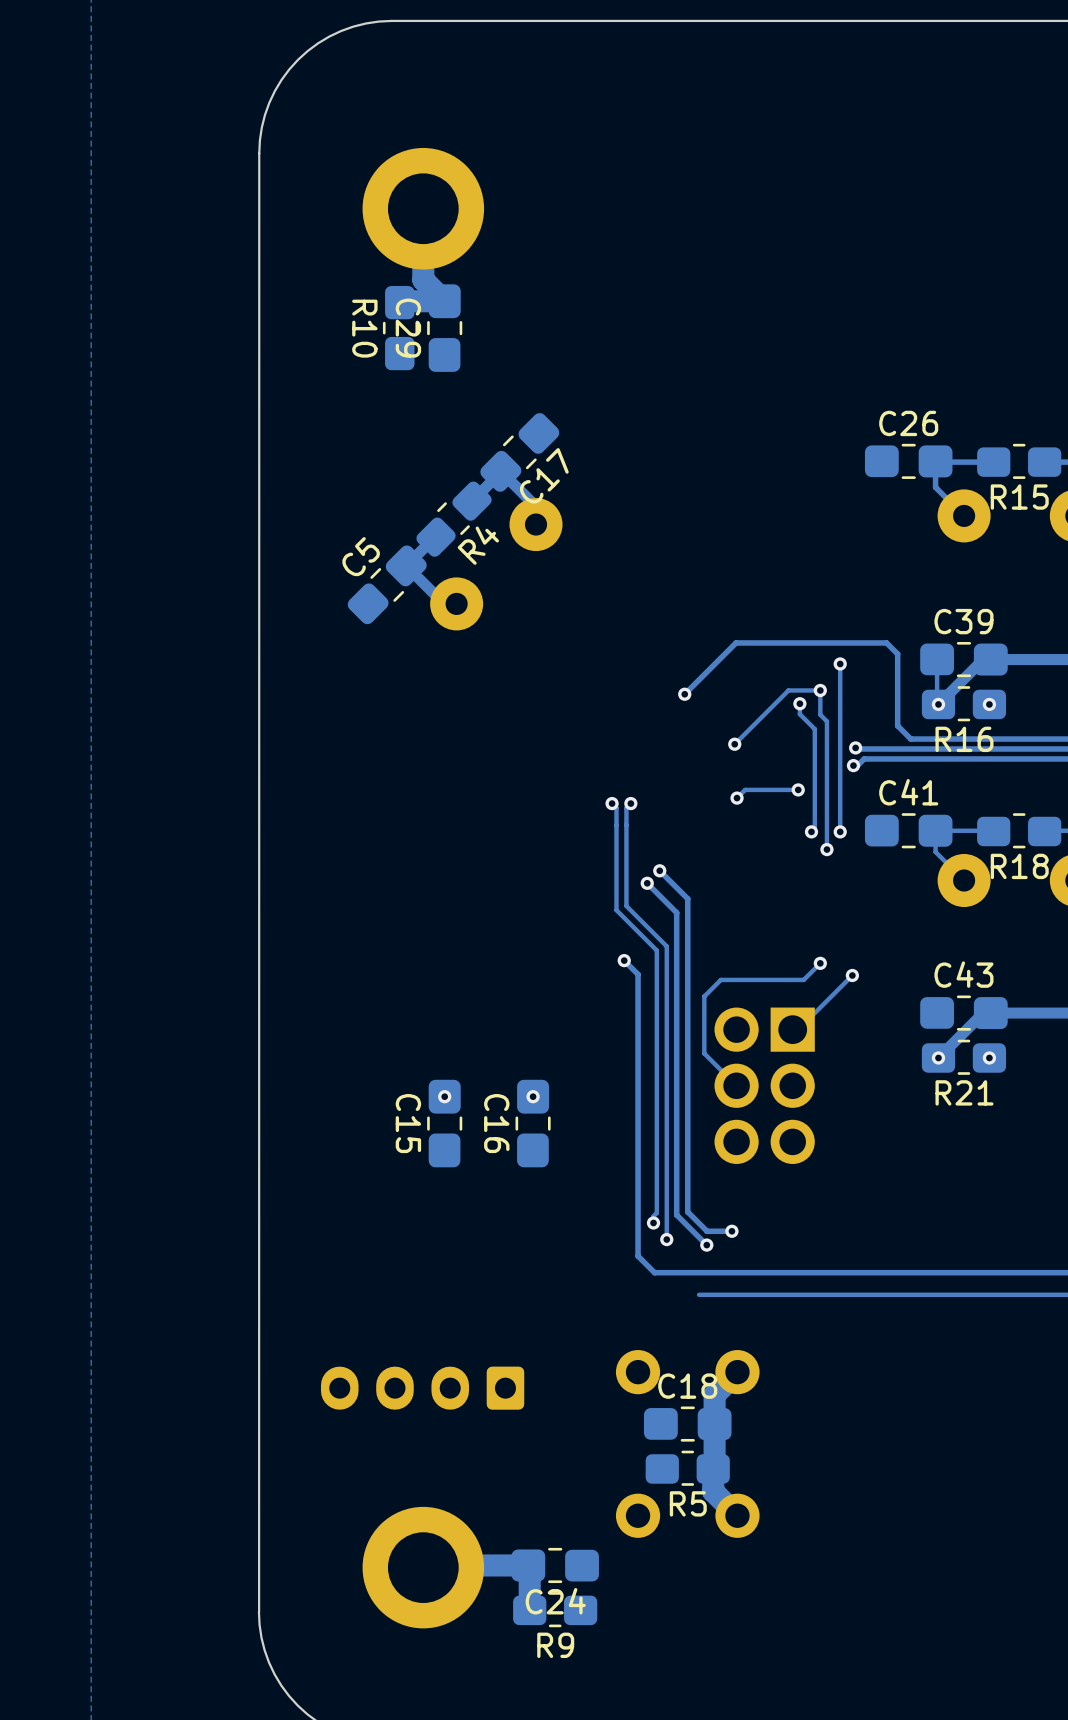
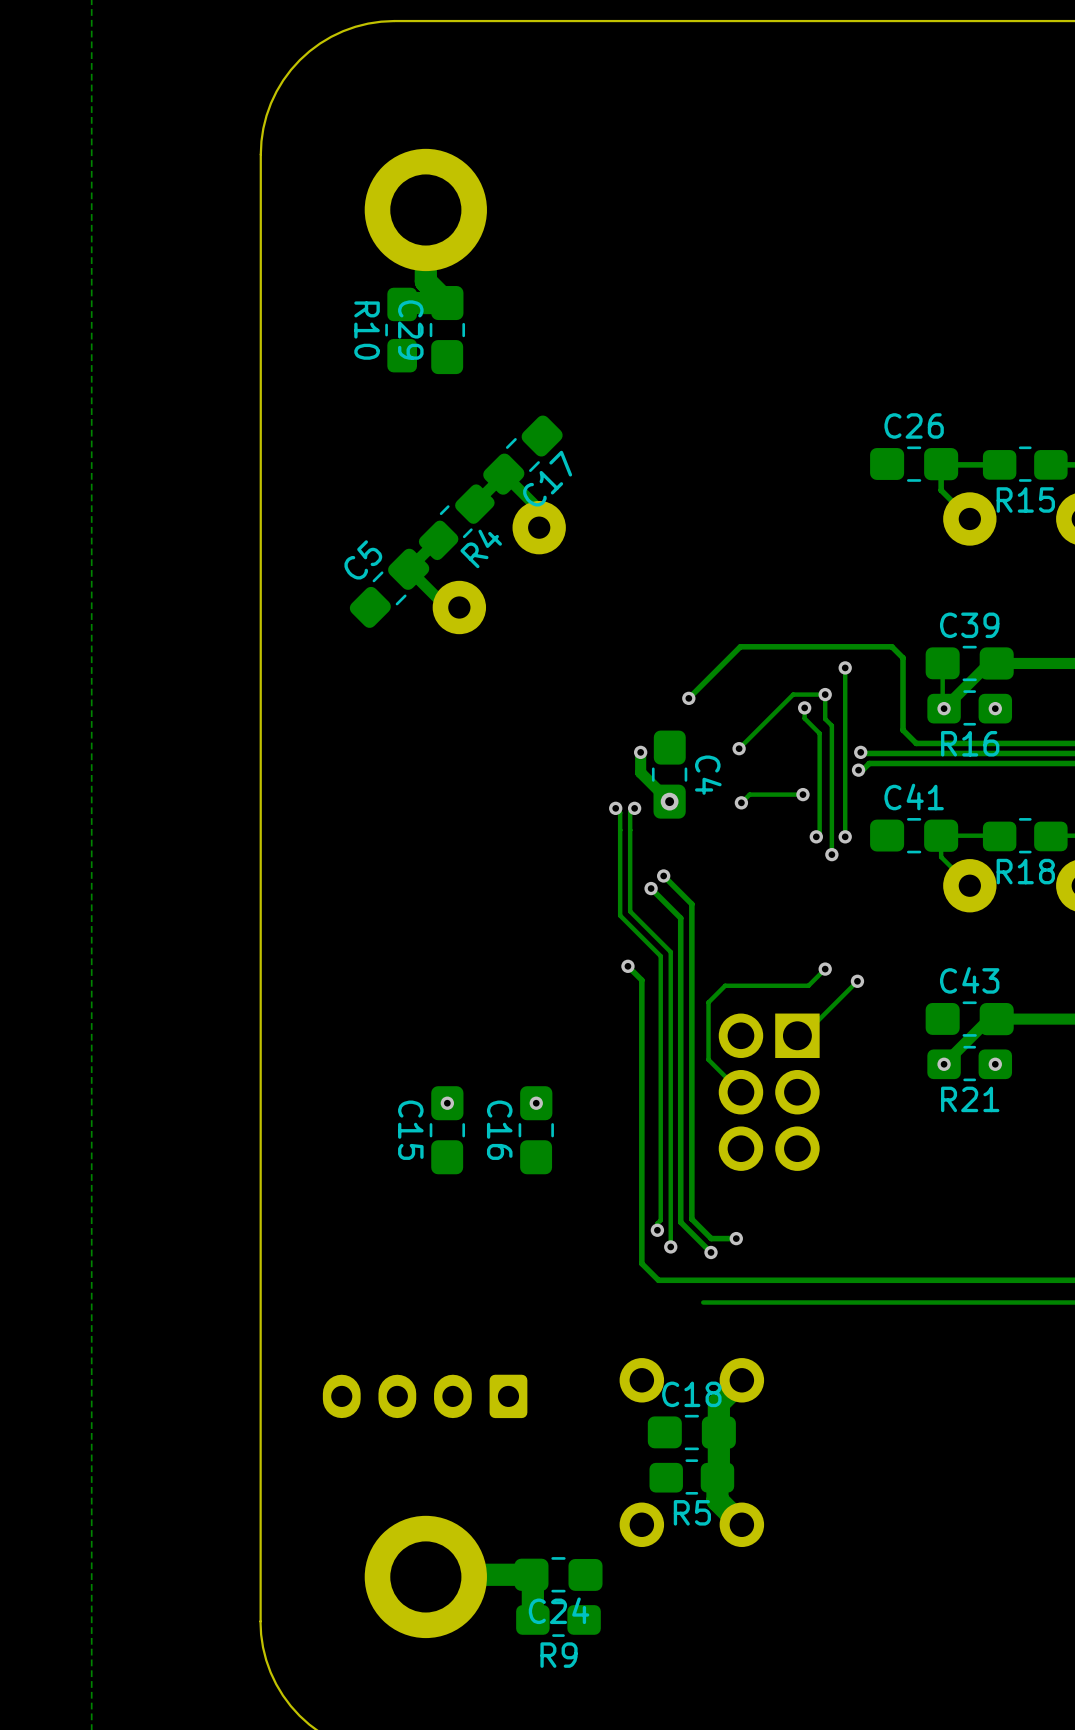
track: none -> (640, 752) (640, 772) (669, 801)
via: none -> (640, 752)
C4: none -> (669, 774)
via: none -> (669, 801)

